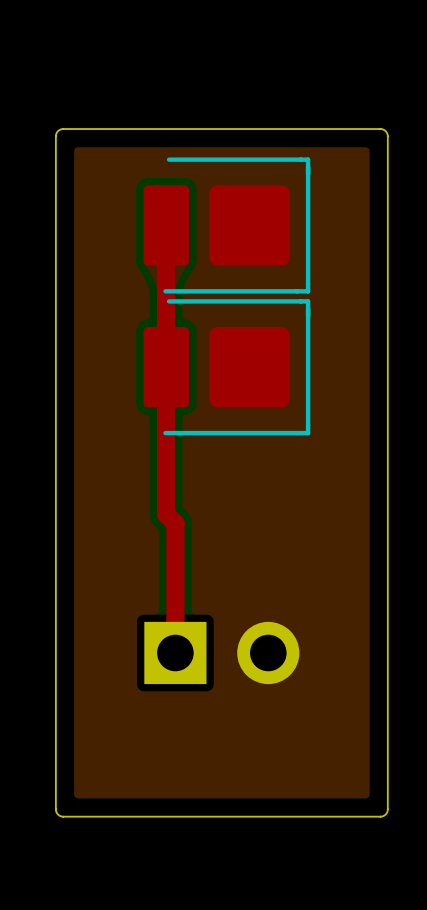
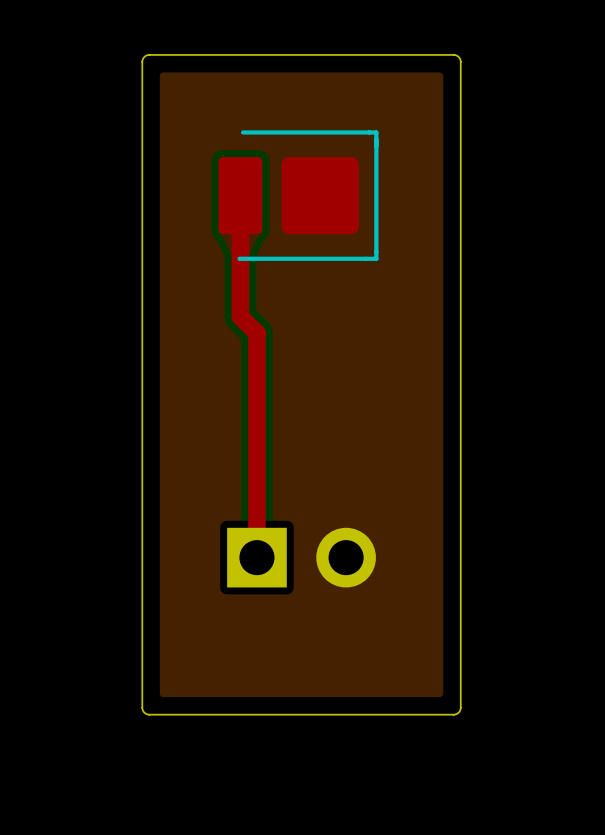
top track: (166, 225) (166, 513) (175, 523) -> (240, 195) (240, 316) (256, 333) (256, 433)
part: (226, 225) -> none
part: none -> (298, 195)
part: (226, 367) -> none

